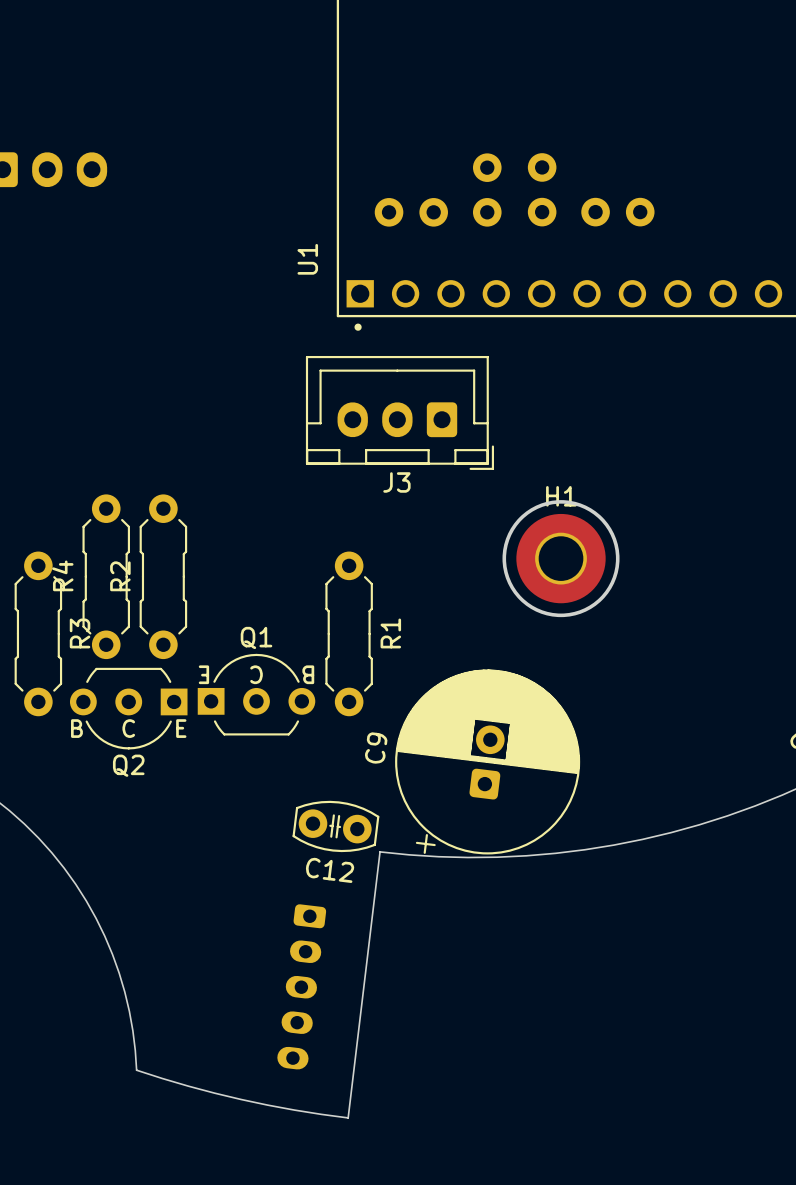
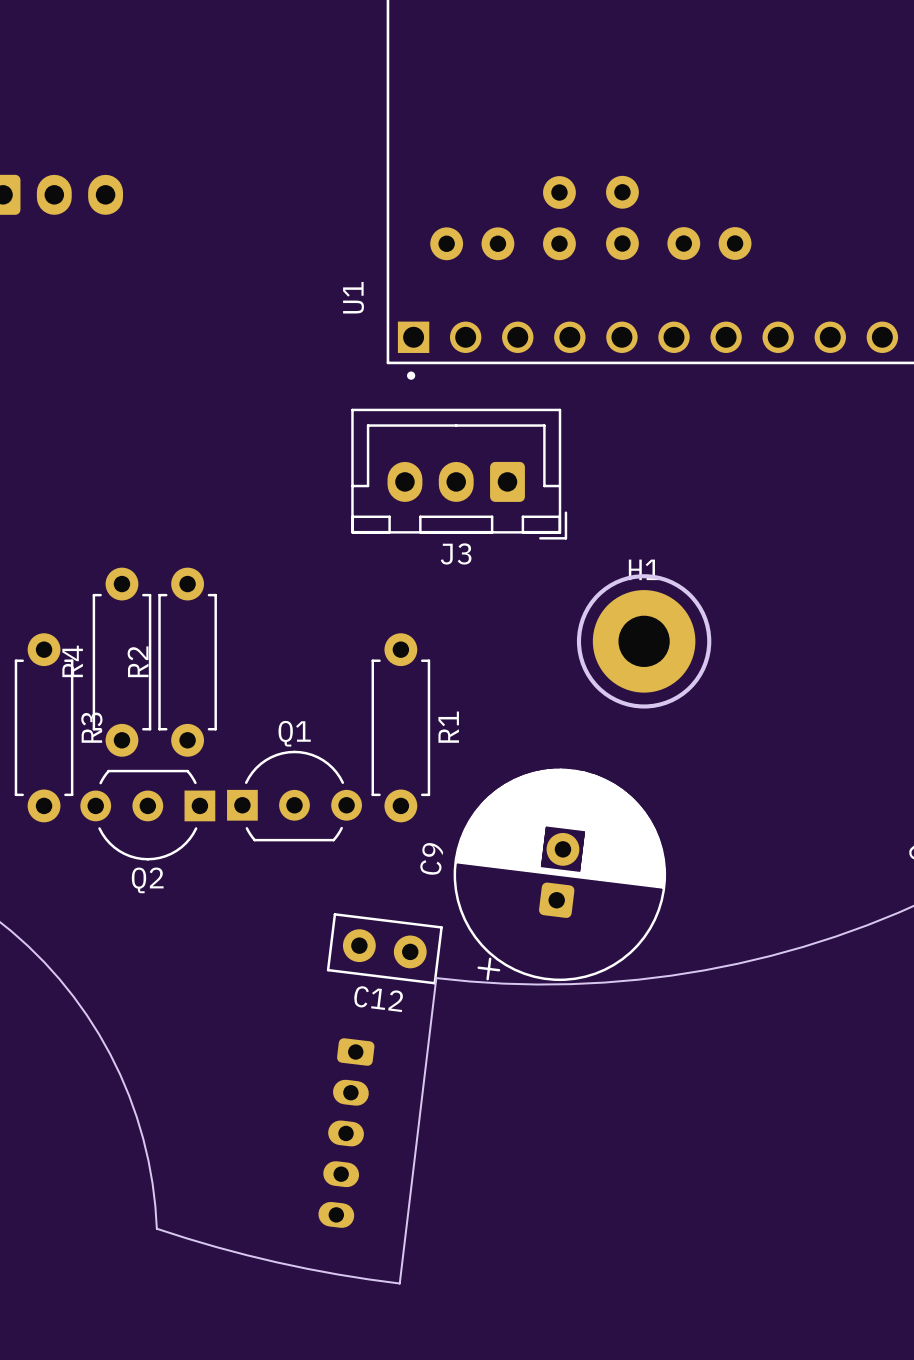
R4 footprint: [82, 494, 130, 660] -> [92, 567, 152, 757]
R2 footprint: [139, 494, 188, 660] -> [158, 567, 217, 757]
R3 footprint: [14, 551, 63, 717] -> [14, 633, 74, 823]
R1 footprint: [325, 551, 373, 717] -> [371, 633, 431, 823]
Q1 footprint: [197, 653, 316, 736] -> [227, 750, 362, 842]
Q2 footprint: [69, 667, 188, 750] -> [80, 769, 216, 861]
C12 footprint: [292, 800, 380, 853] -> [326, 913, 443, 985]

